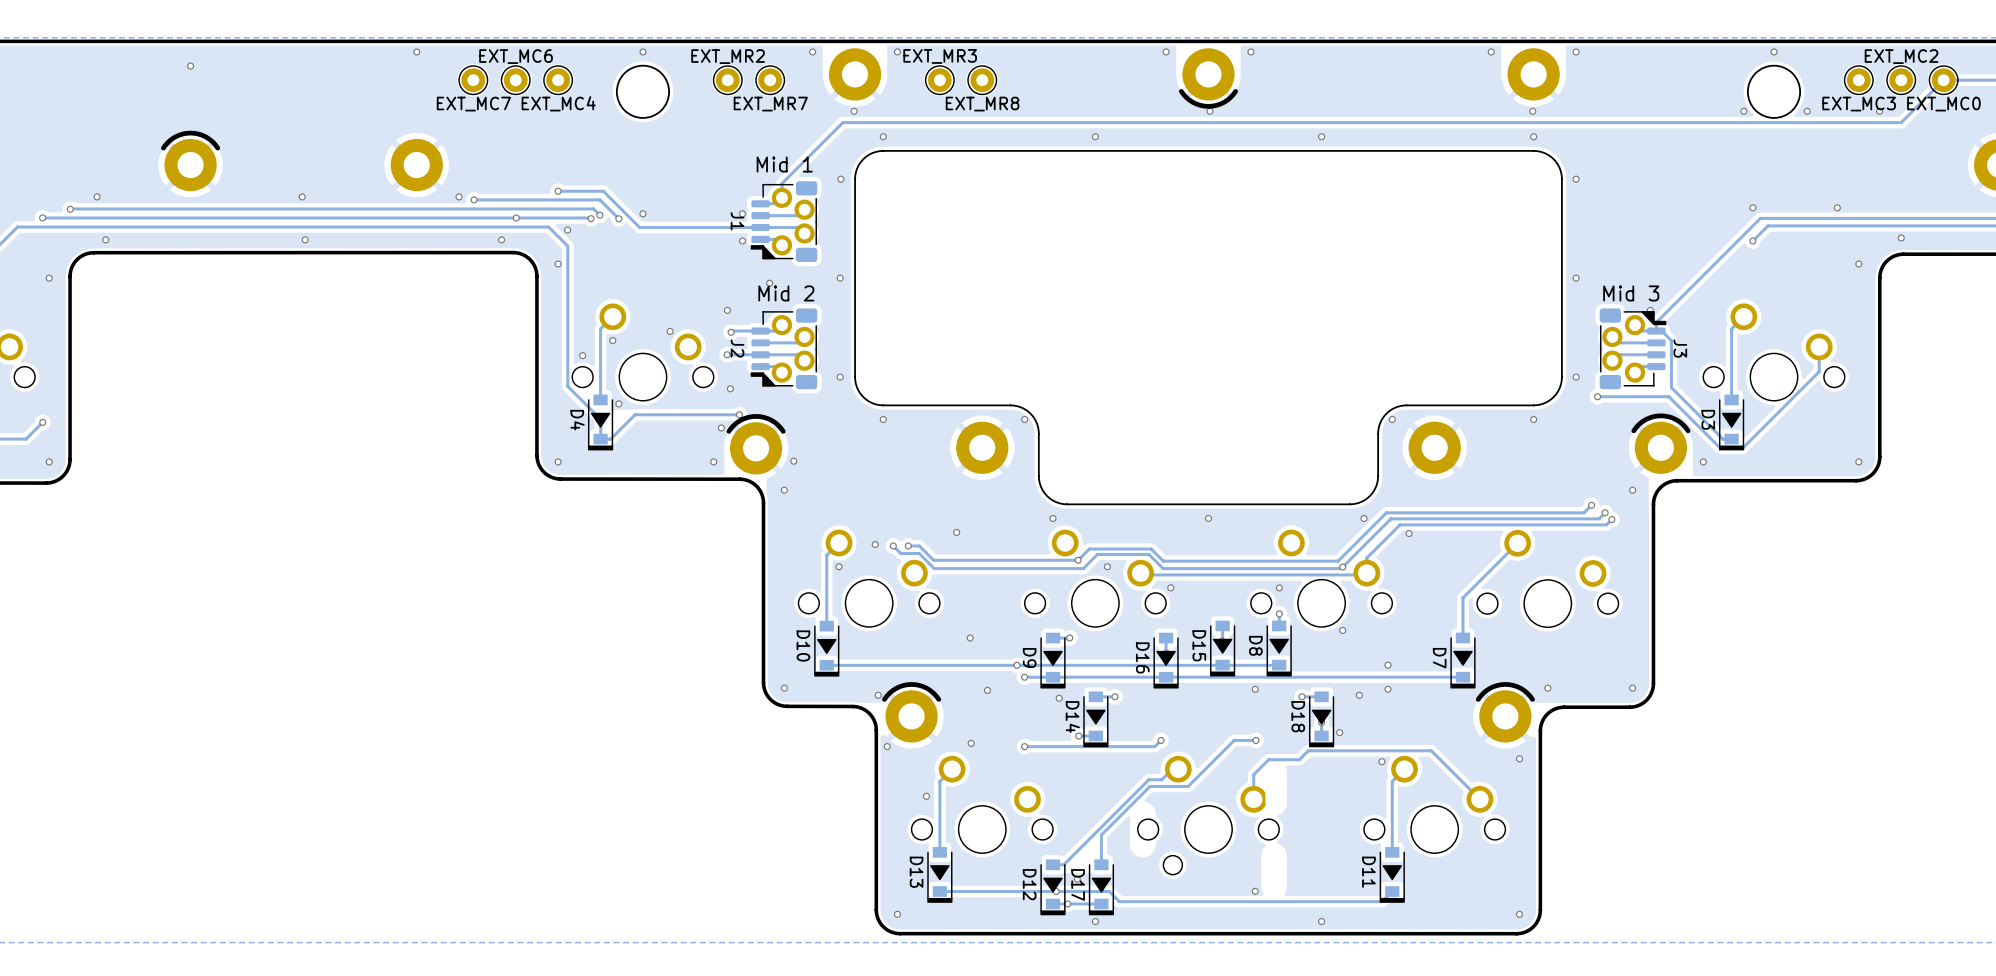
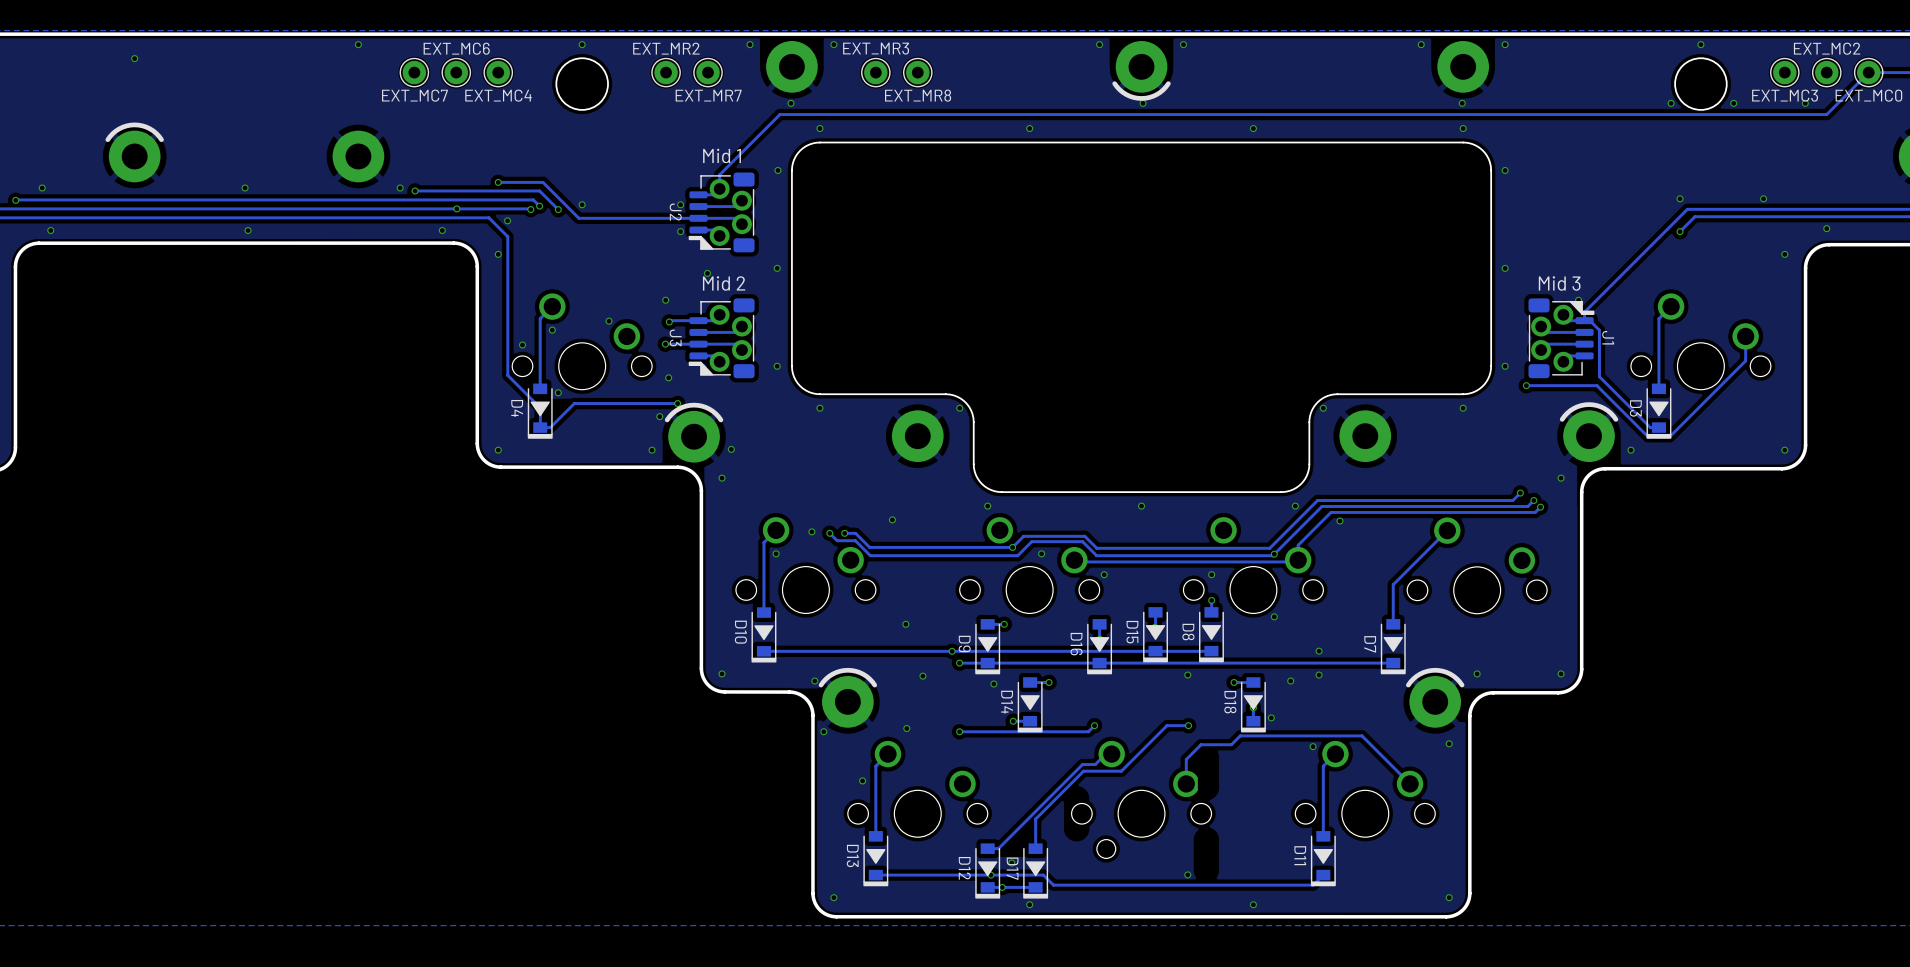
J1 name: J1 (737, 221) -> J2 (675, 212)
J2 name: J2 (737, 348) -> J3 (675, 337)
J3 name: J3 (1680, 348) -> J1 (1608, 337)

